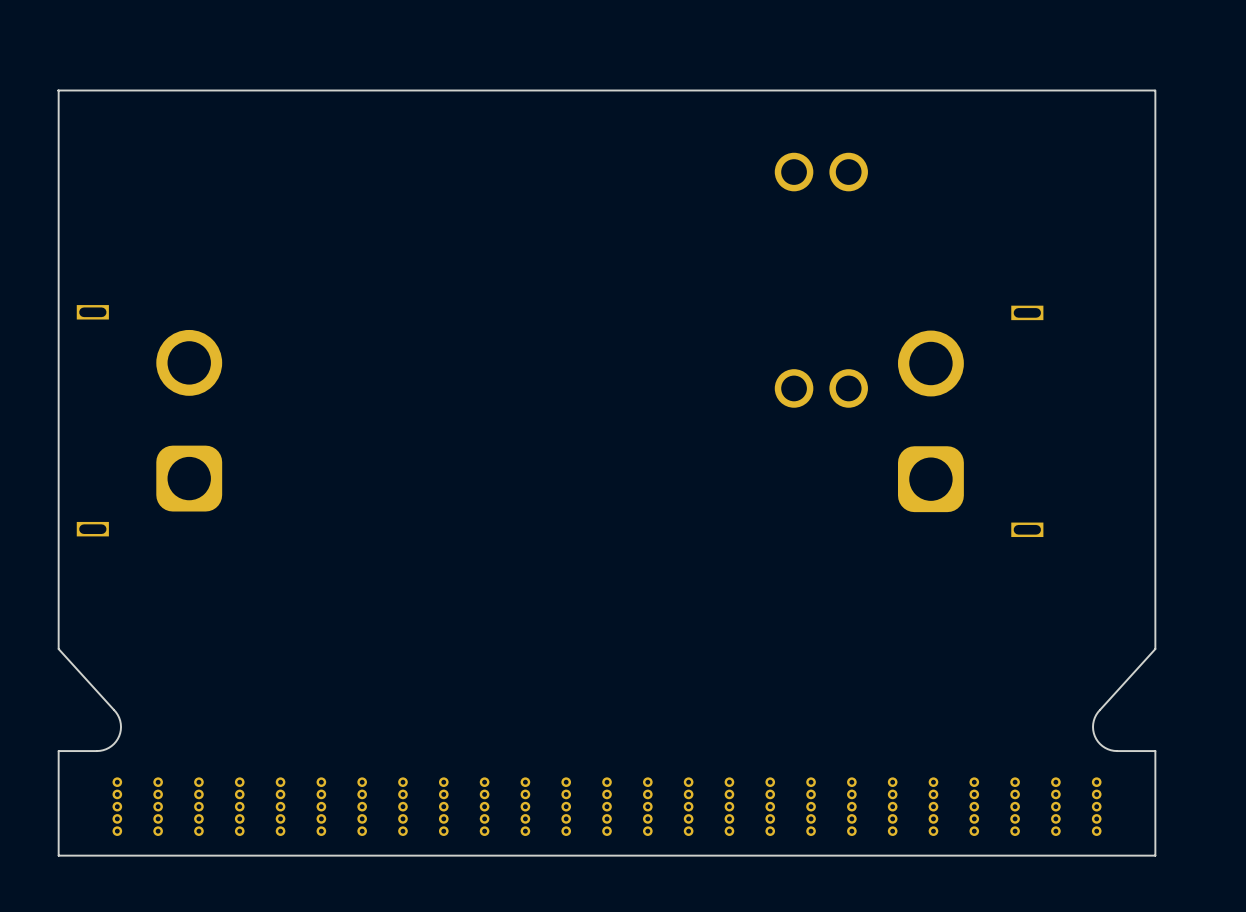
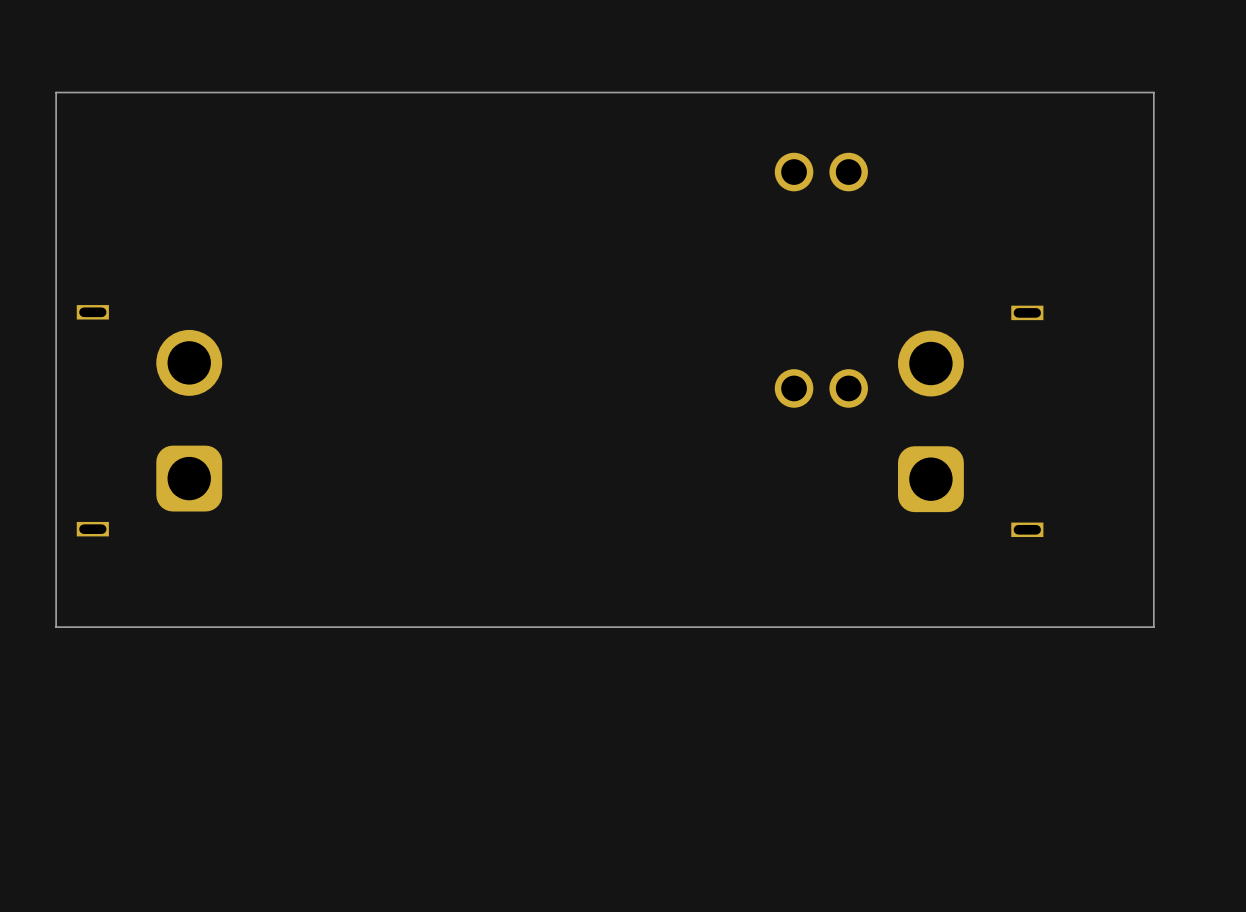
drawing: [57, 89, 1157, 857] -> none
board edge: none -> (1153, 92) (56, 92) (56, 627) (1153, 627) (1153, 92)
part: (607, 806) -> none

